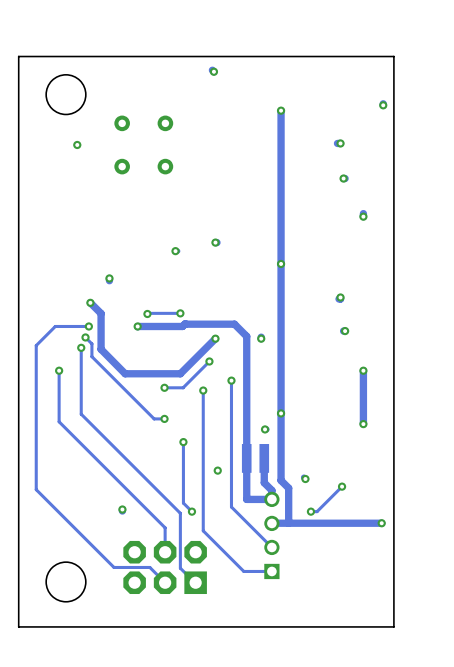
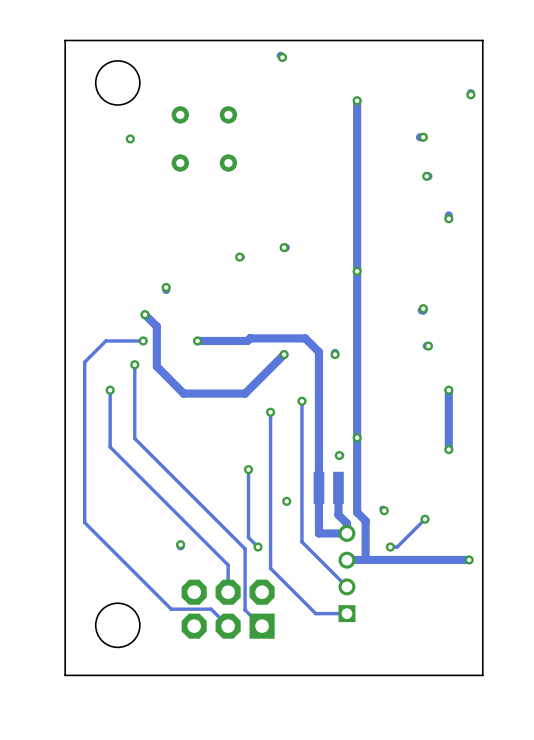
via: (147, 313) -> none
track: (180, 313) (147, 313) -> none
via: (180, 313) -> none
track: (85, 337) (91, 343) (91, 356) (154, 418) (164, 418) -> none
via: (85, 337) -> none
track: (209, 361) (183, 387) (164, 387) -> none
via: (209, 361) -> none
via: (164, 387) -> none
via: (164, 418) -> none

